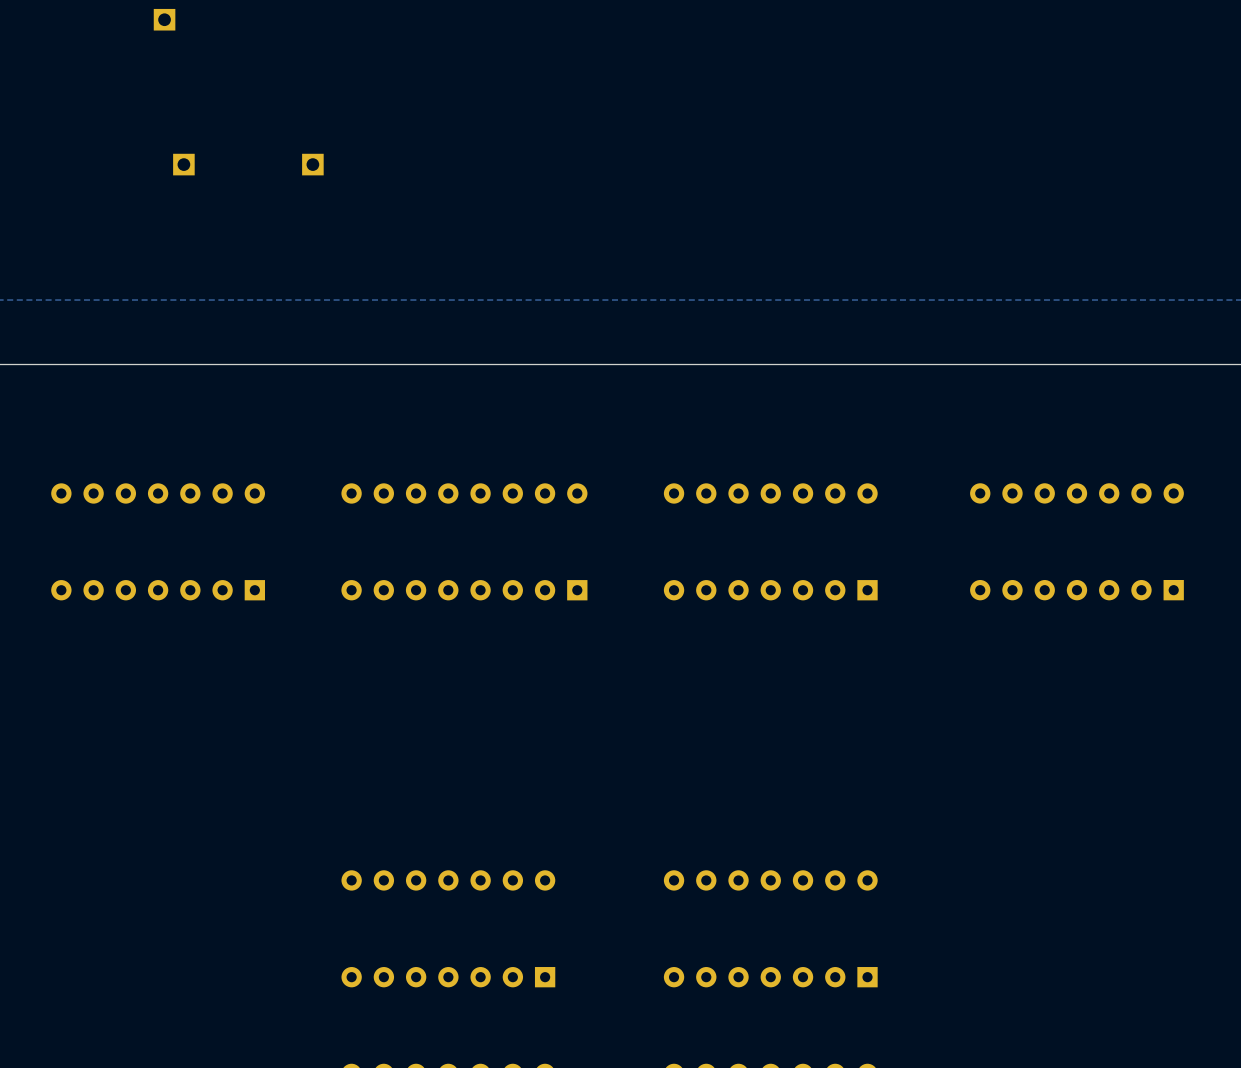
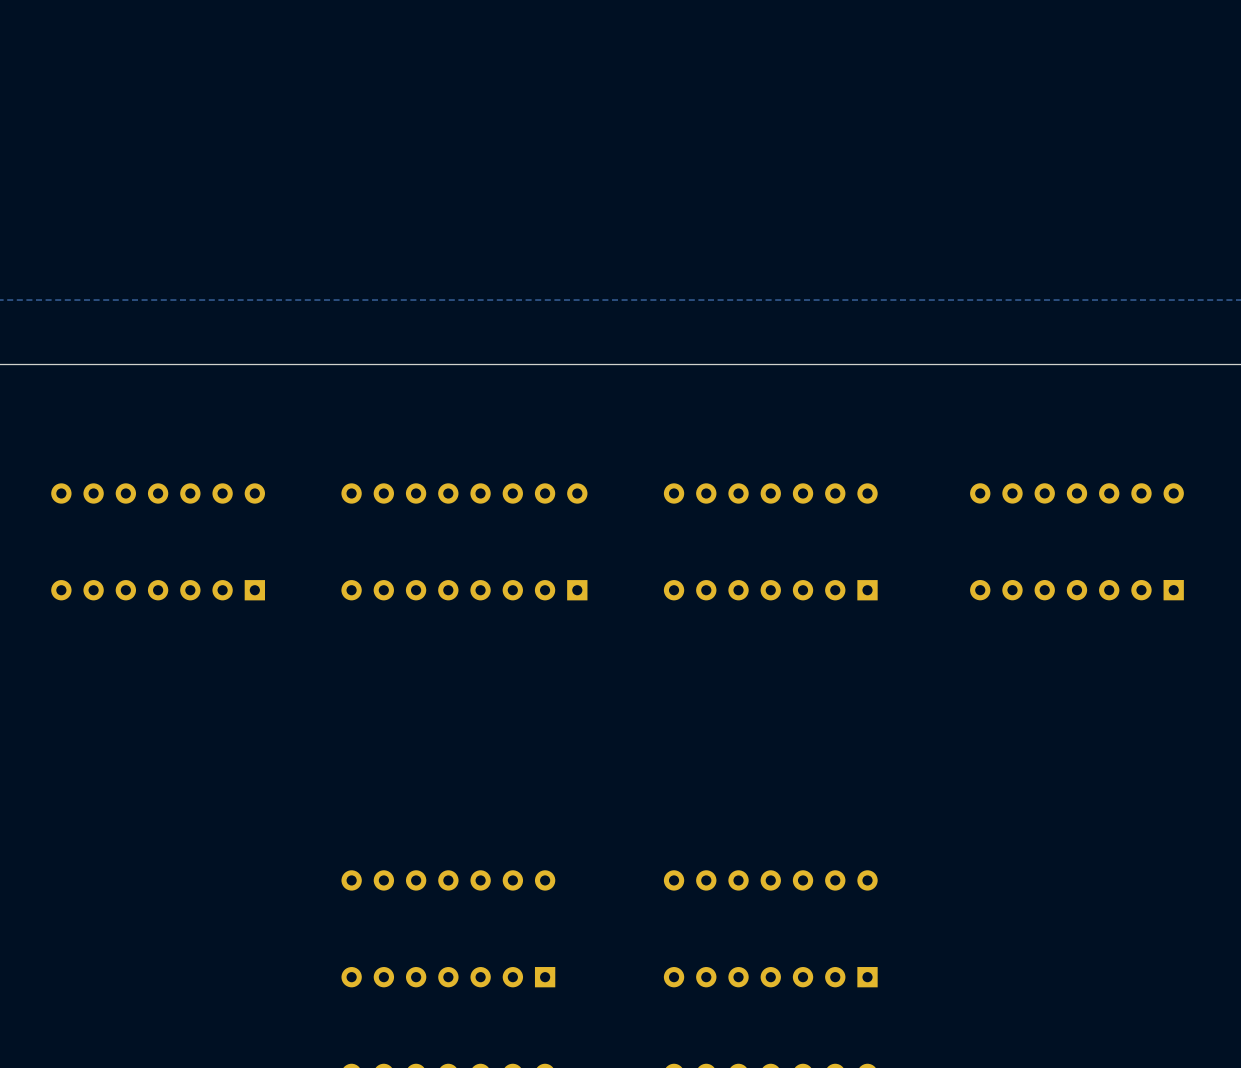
part: (164, 19) -> none
part: (183, 164) -> none
part: (312, 164) -> none

